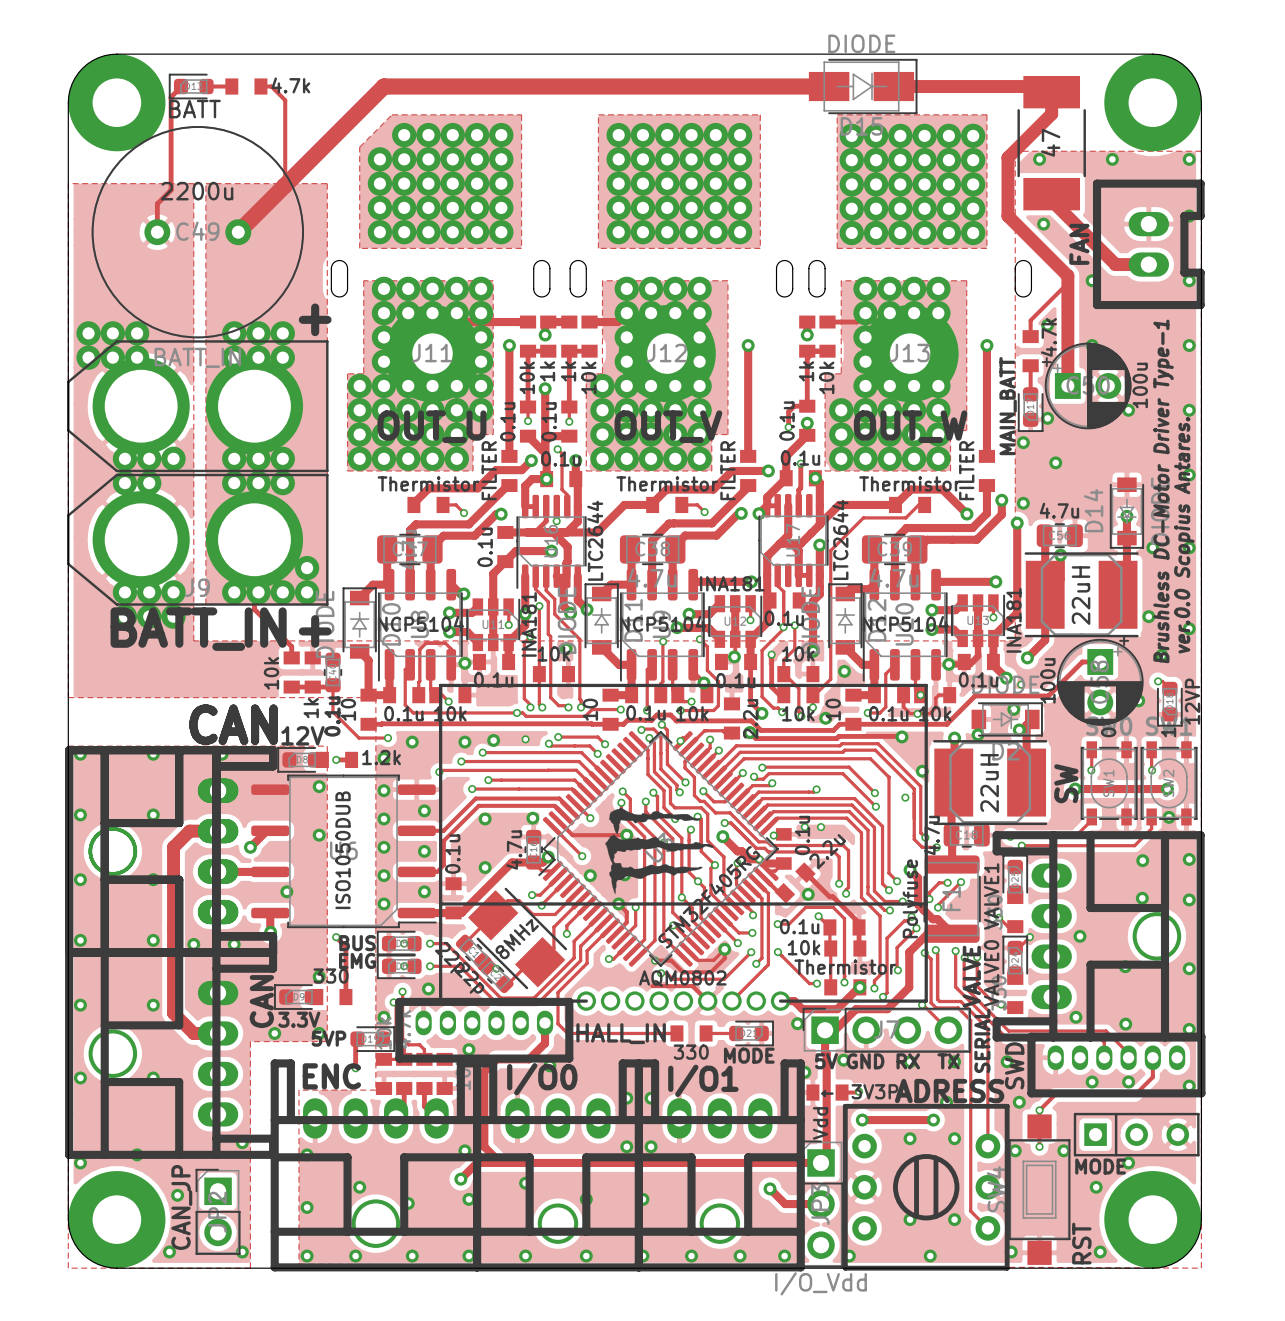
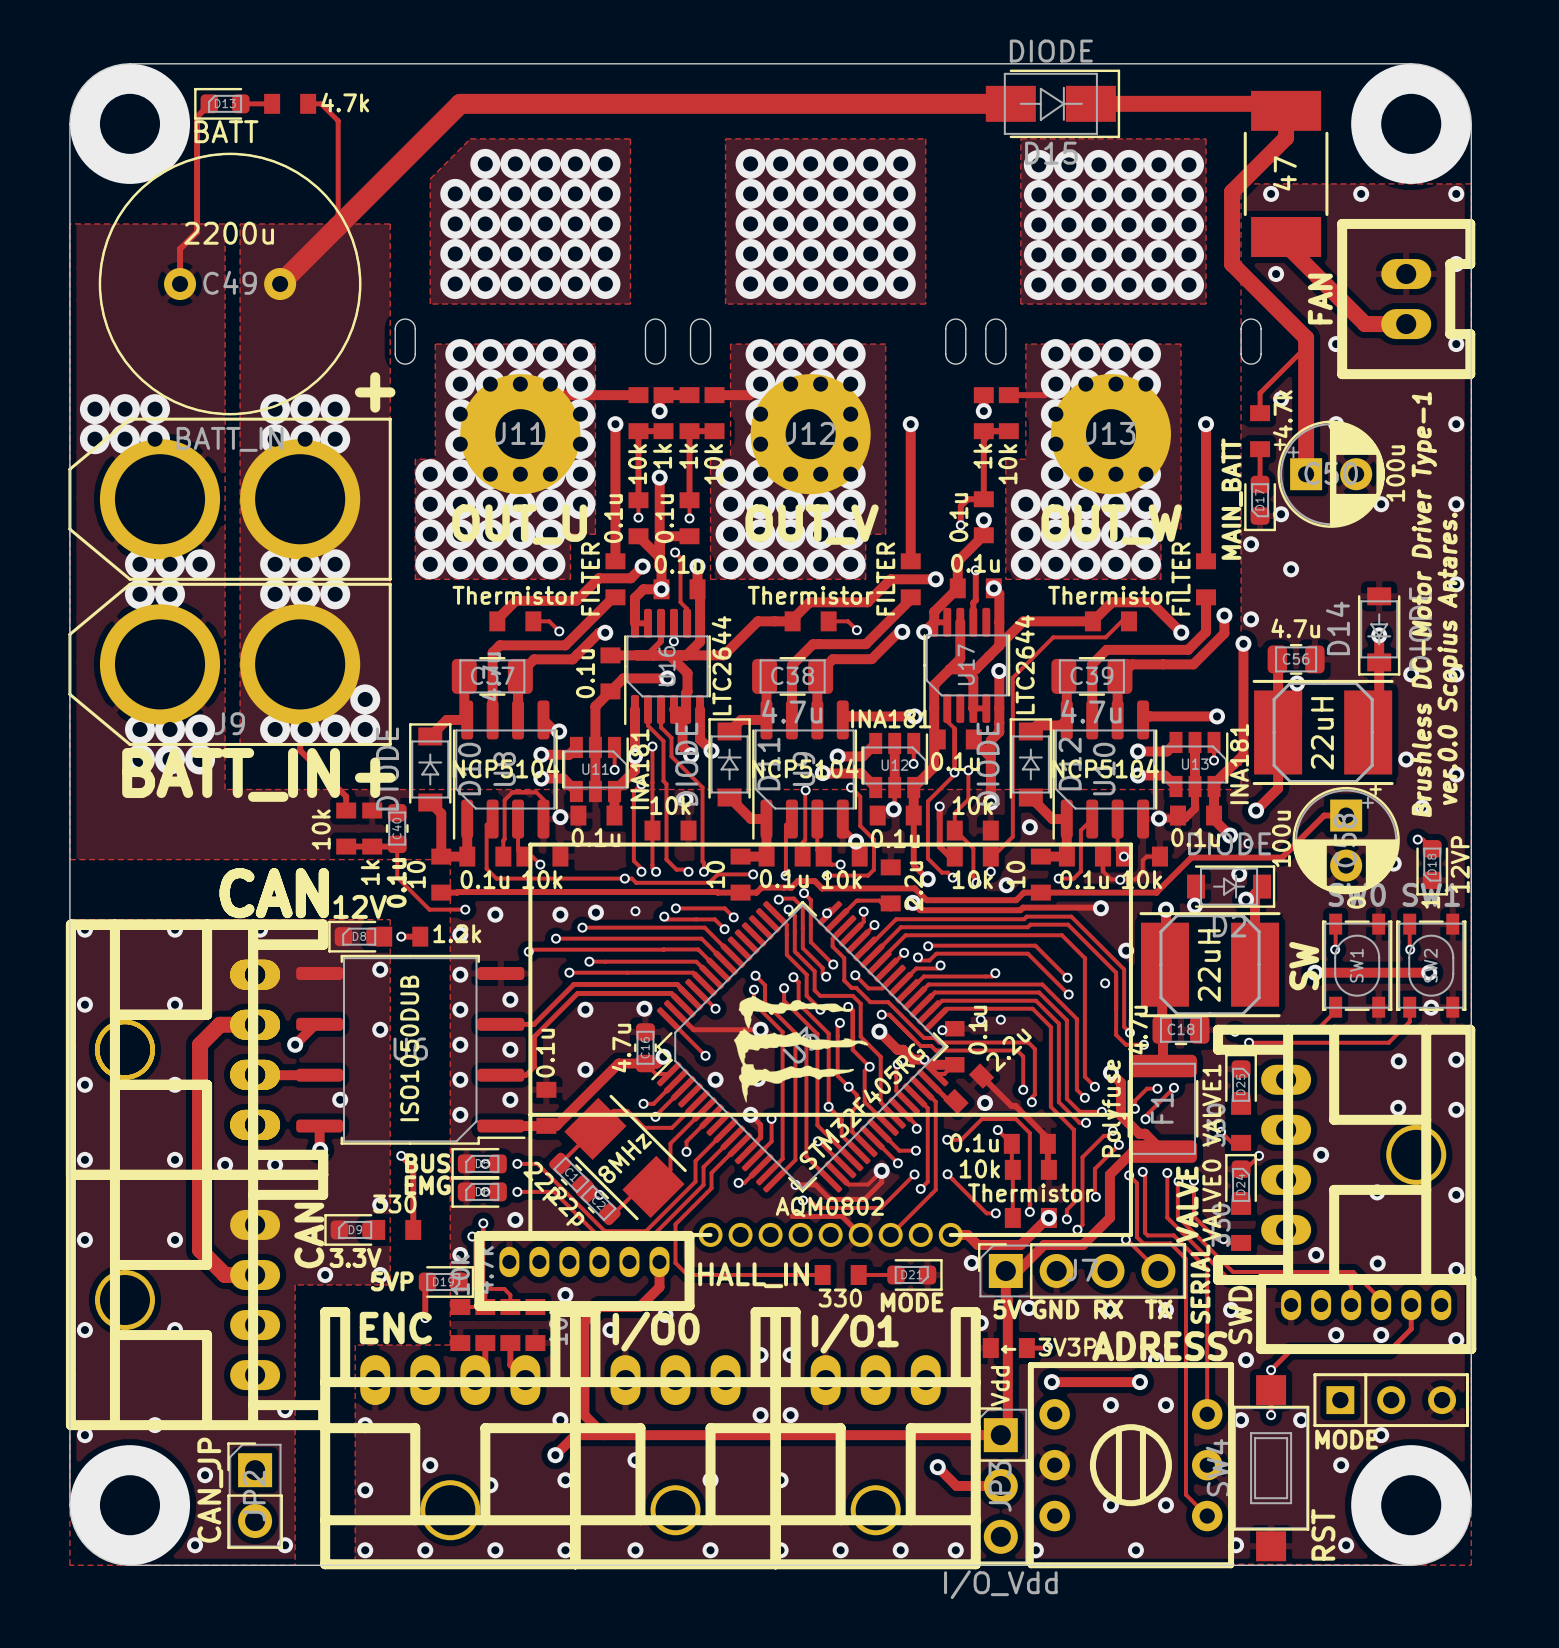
via: none -> (610, 1330)

